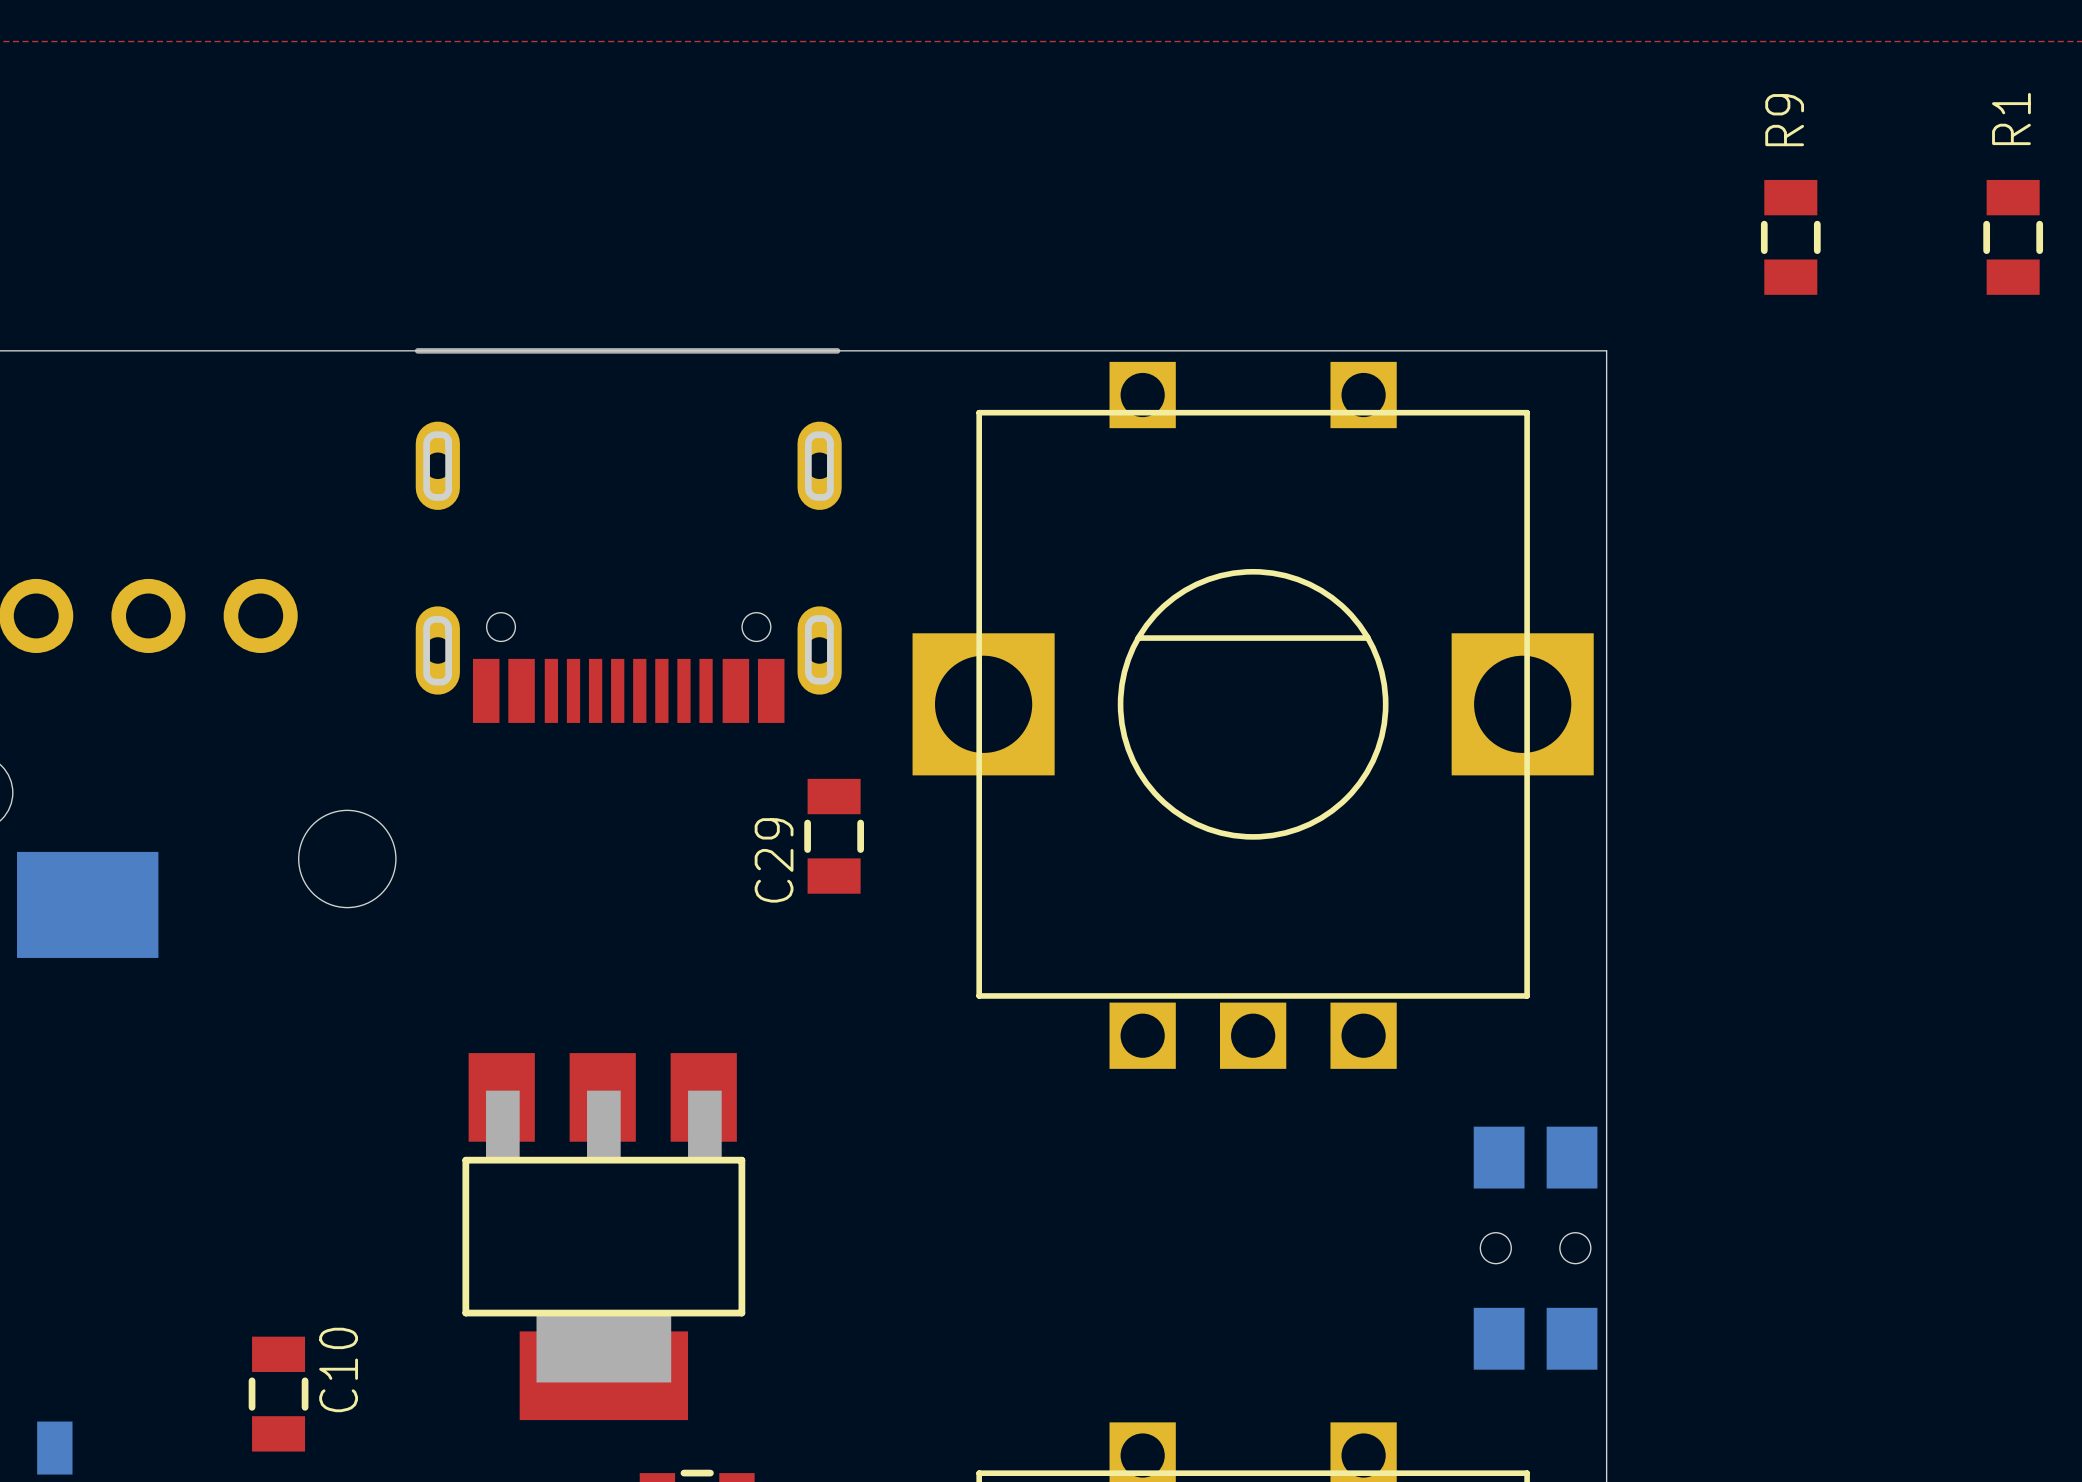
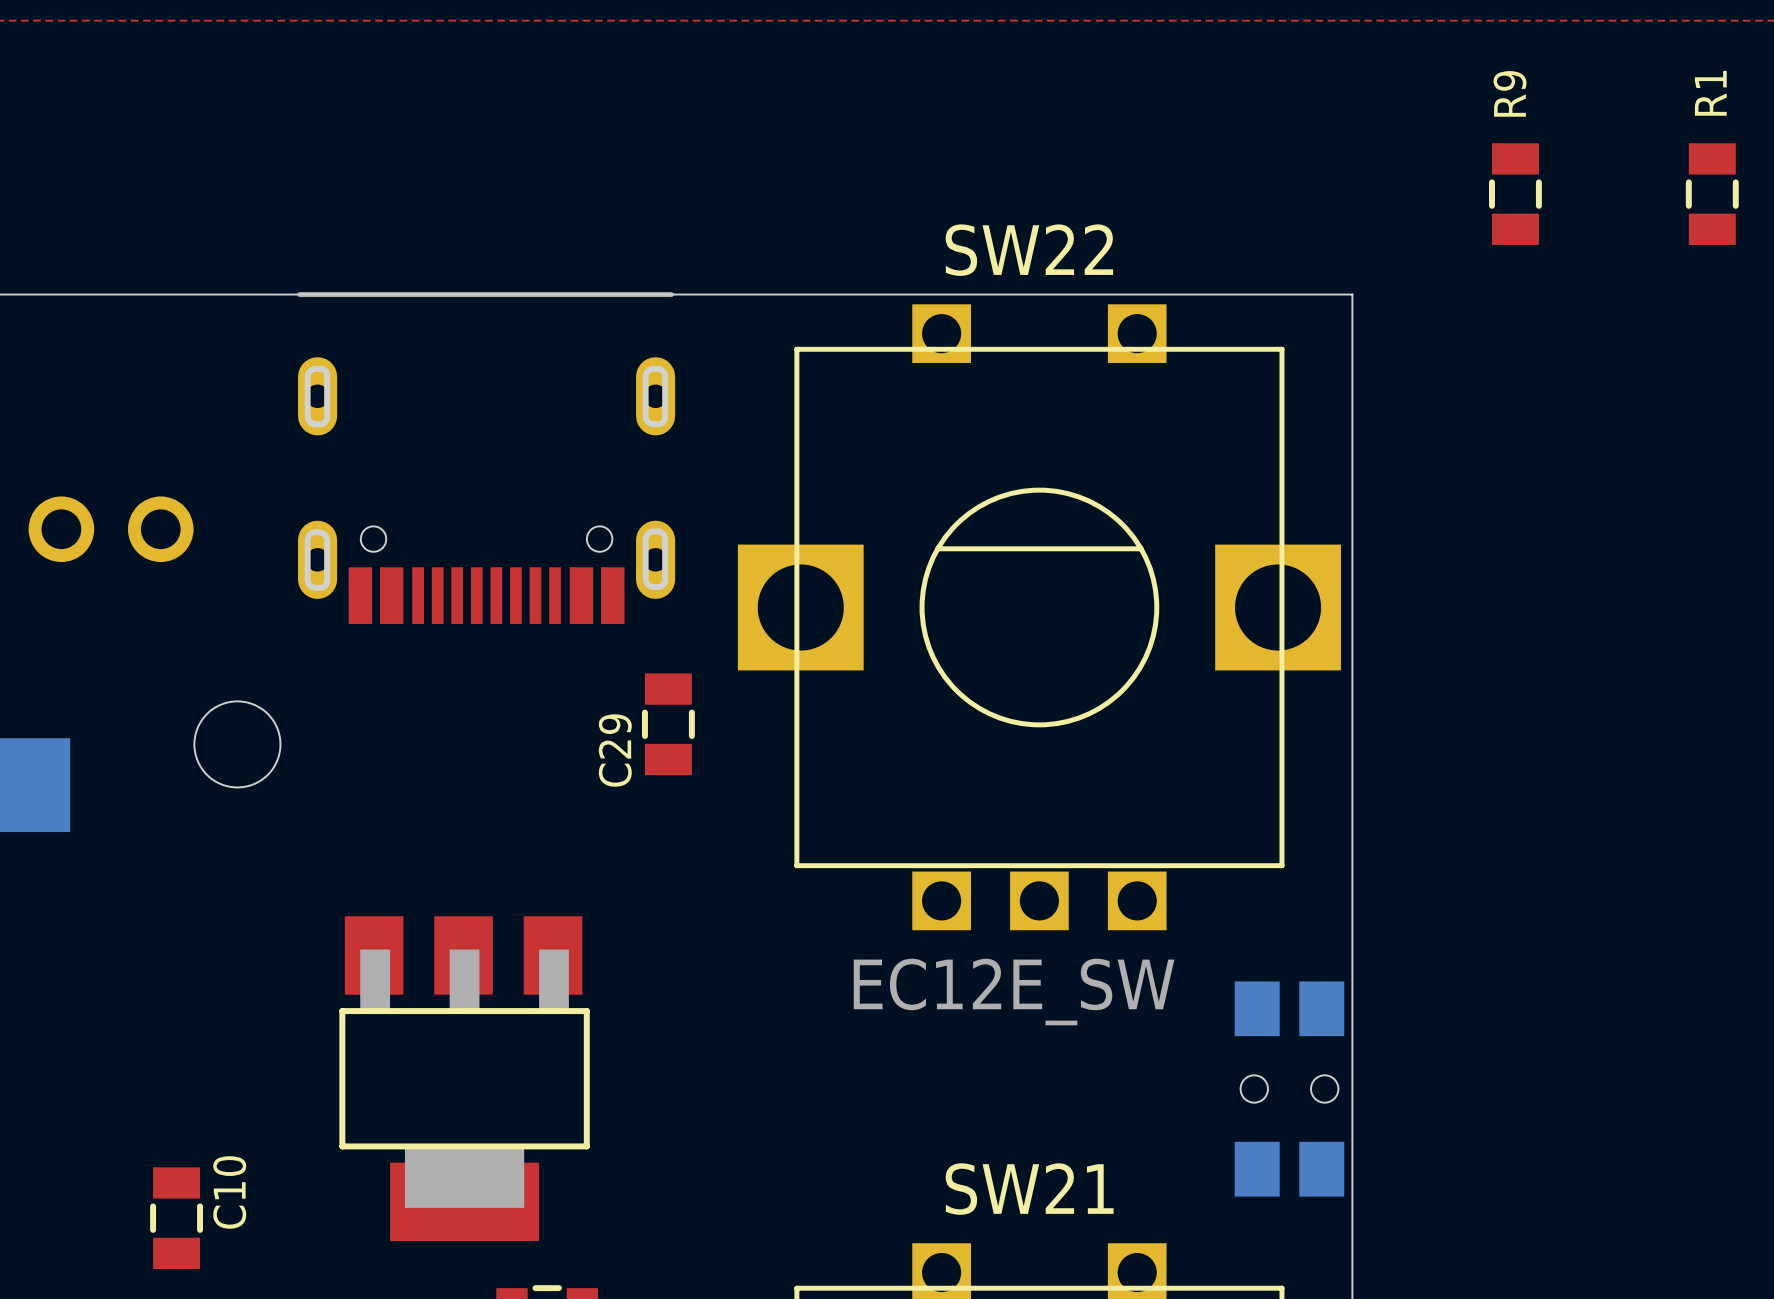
SW22 name: none -> SW22 (1029, 250)
SW22 value: none -> EC12E_SW (1014, 992)
SW21 name: none -> SW21 (1029, 1189)

